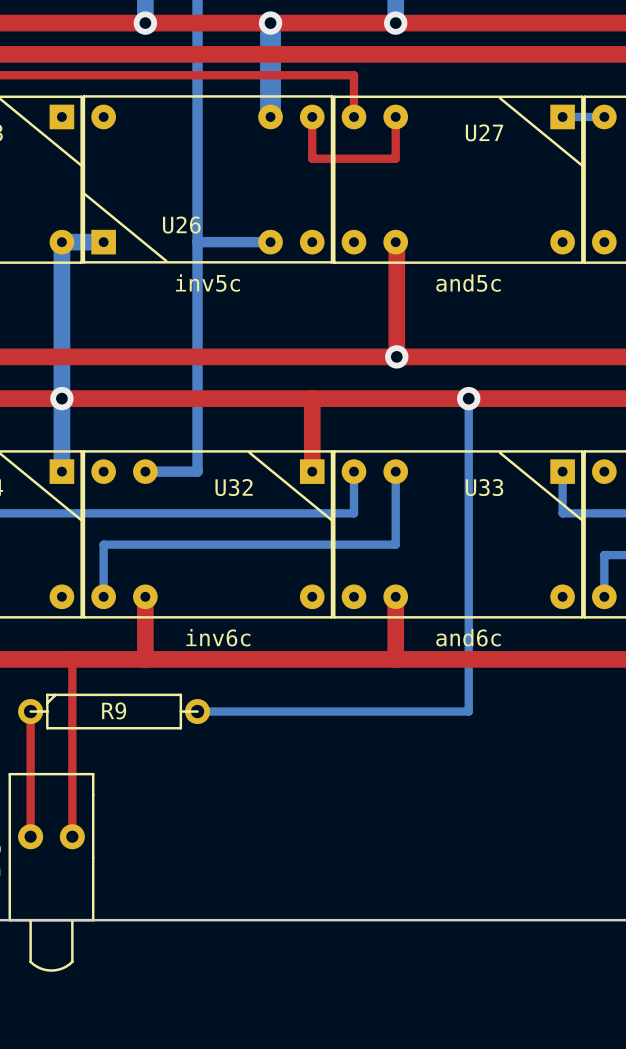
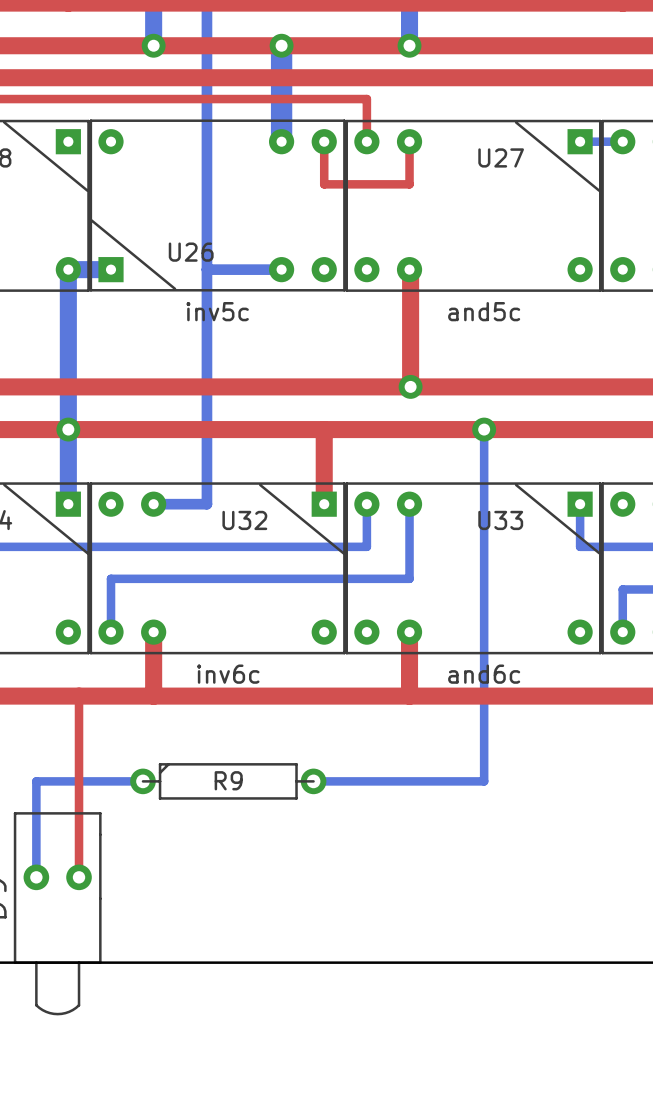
top track: (30, 711) (30, 836) -> none
R9 position: (114, 711) -> (228, 781)
bottom track: (197, 711) (468, 711) -> (313, 781) (484, 781) (484, 749)
bottom track: none -> (142, 781) (36, 781) (36, 877)

